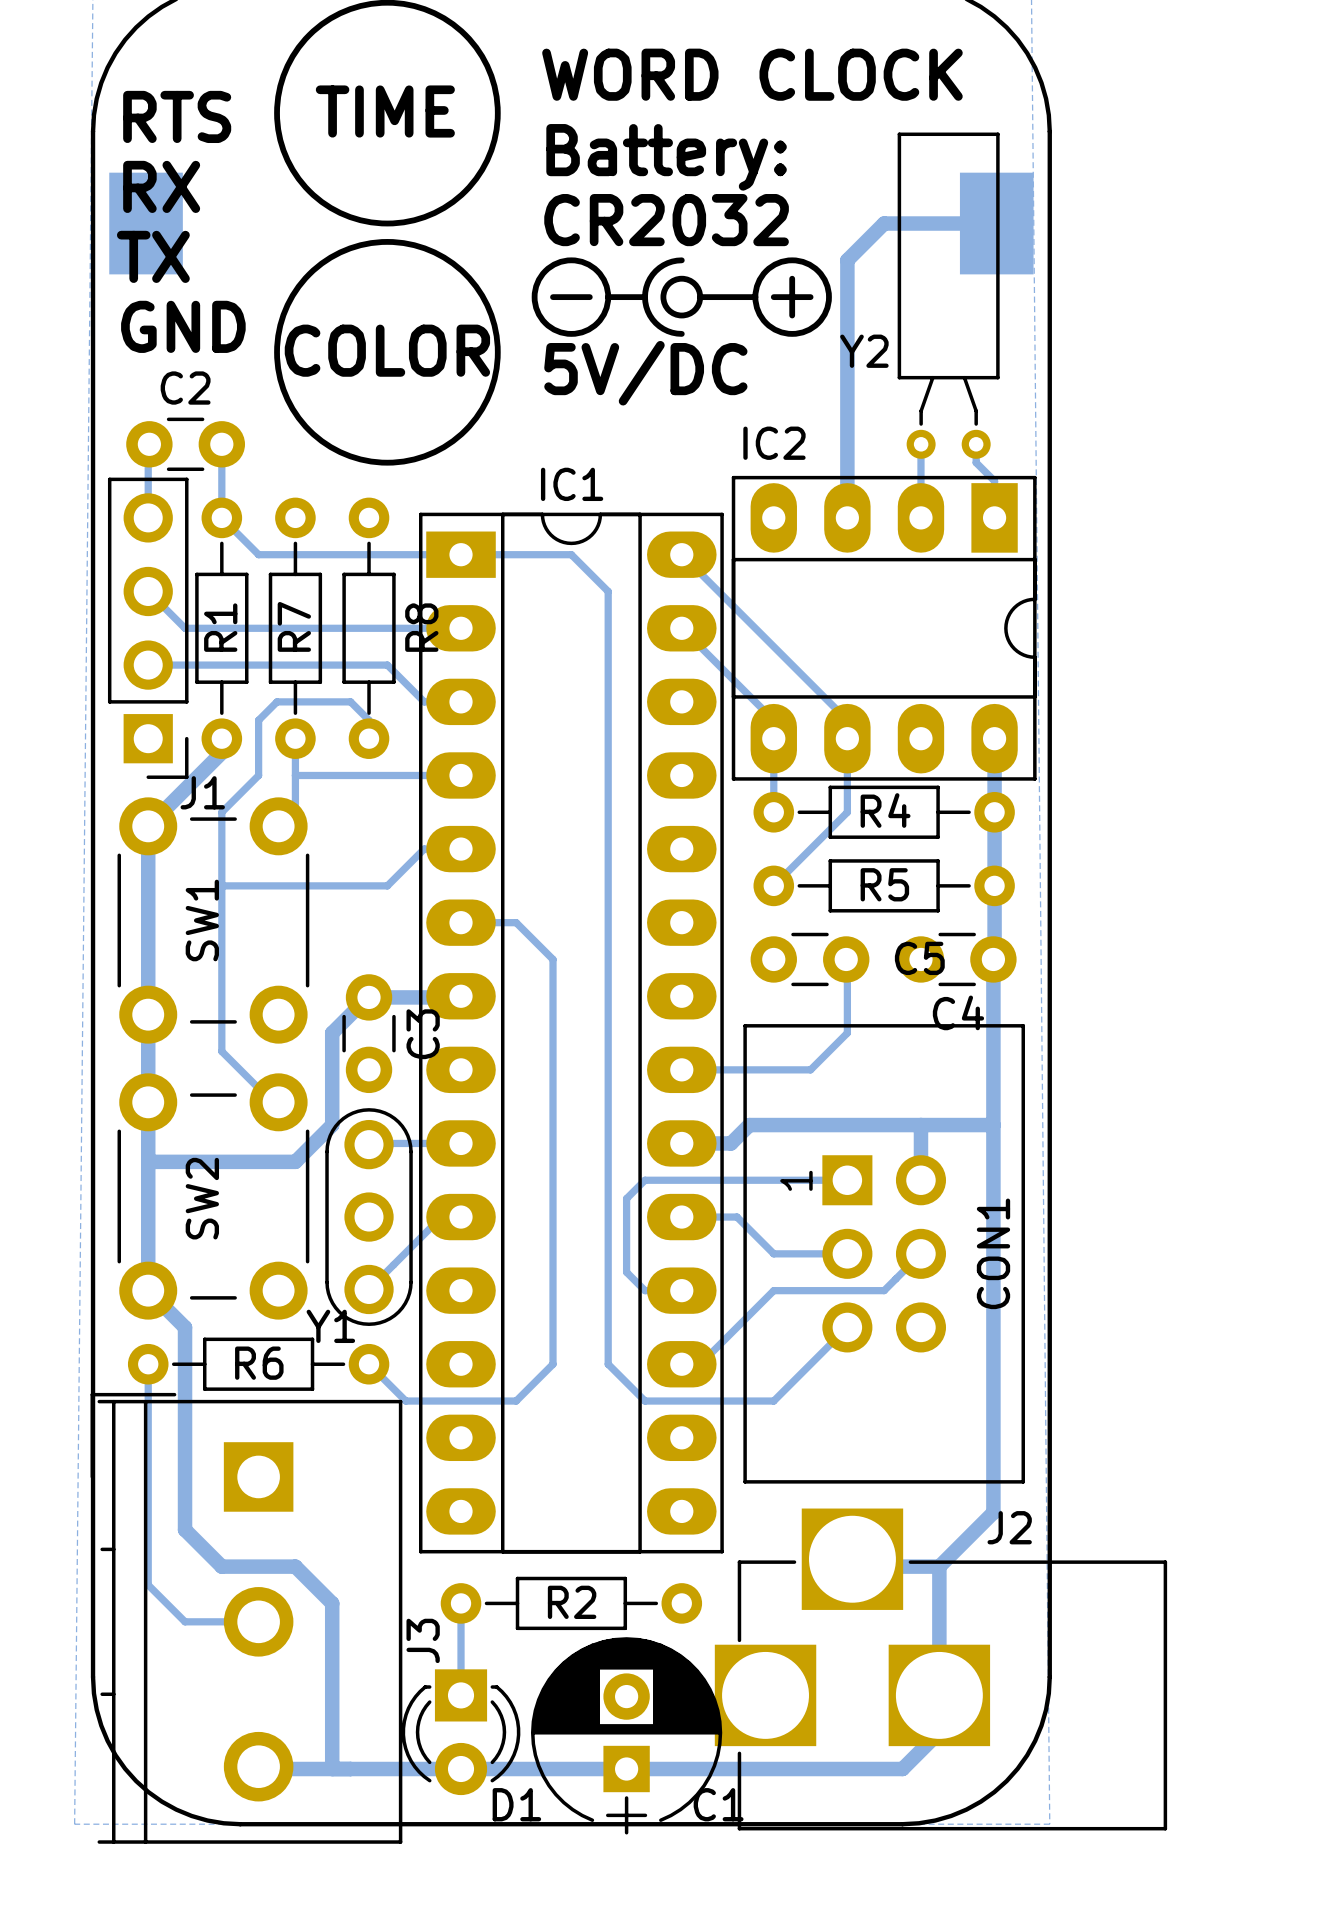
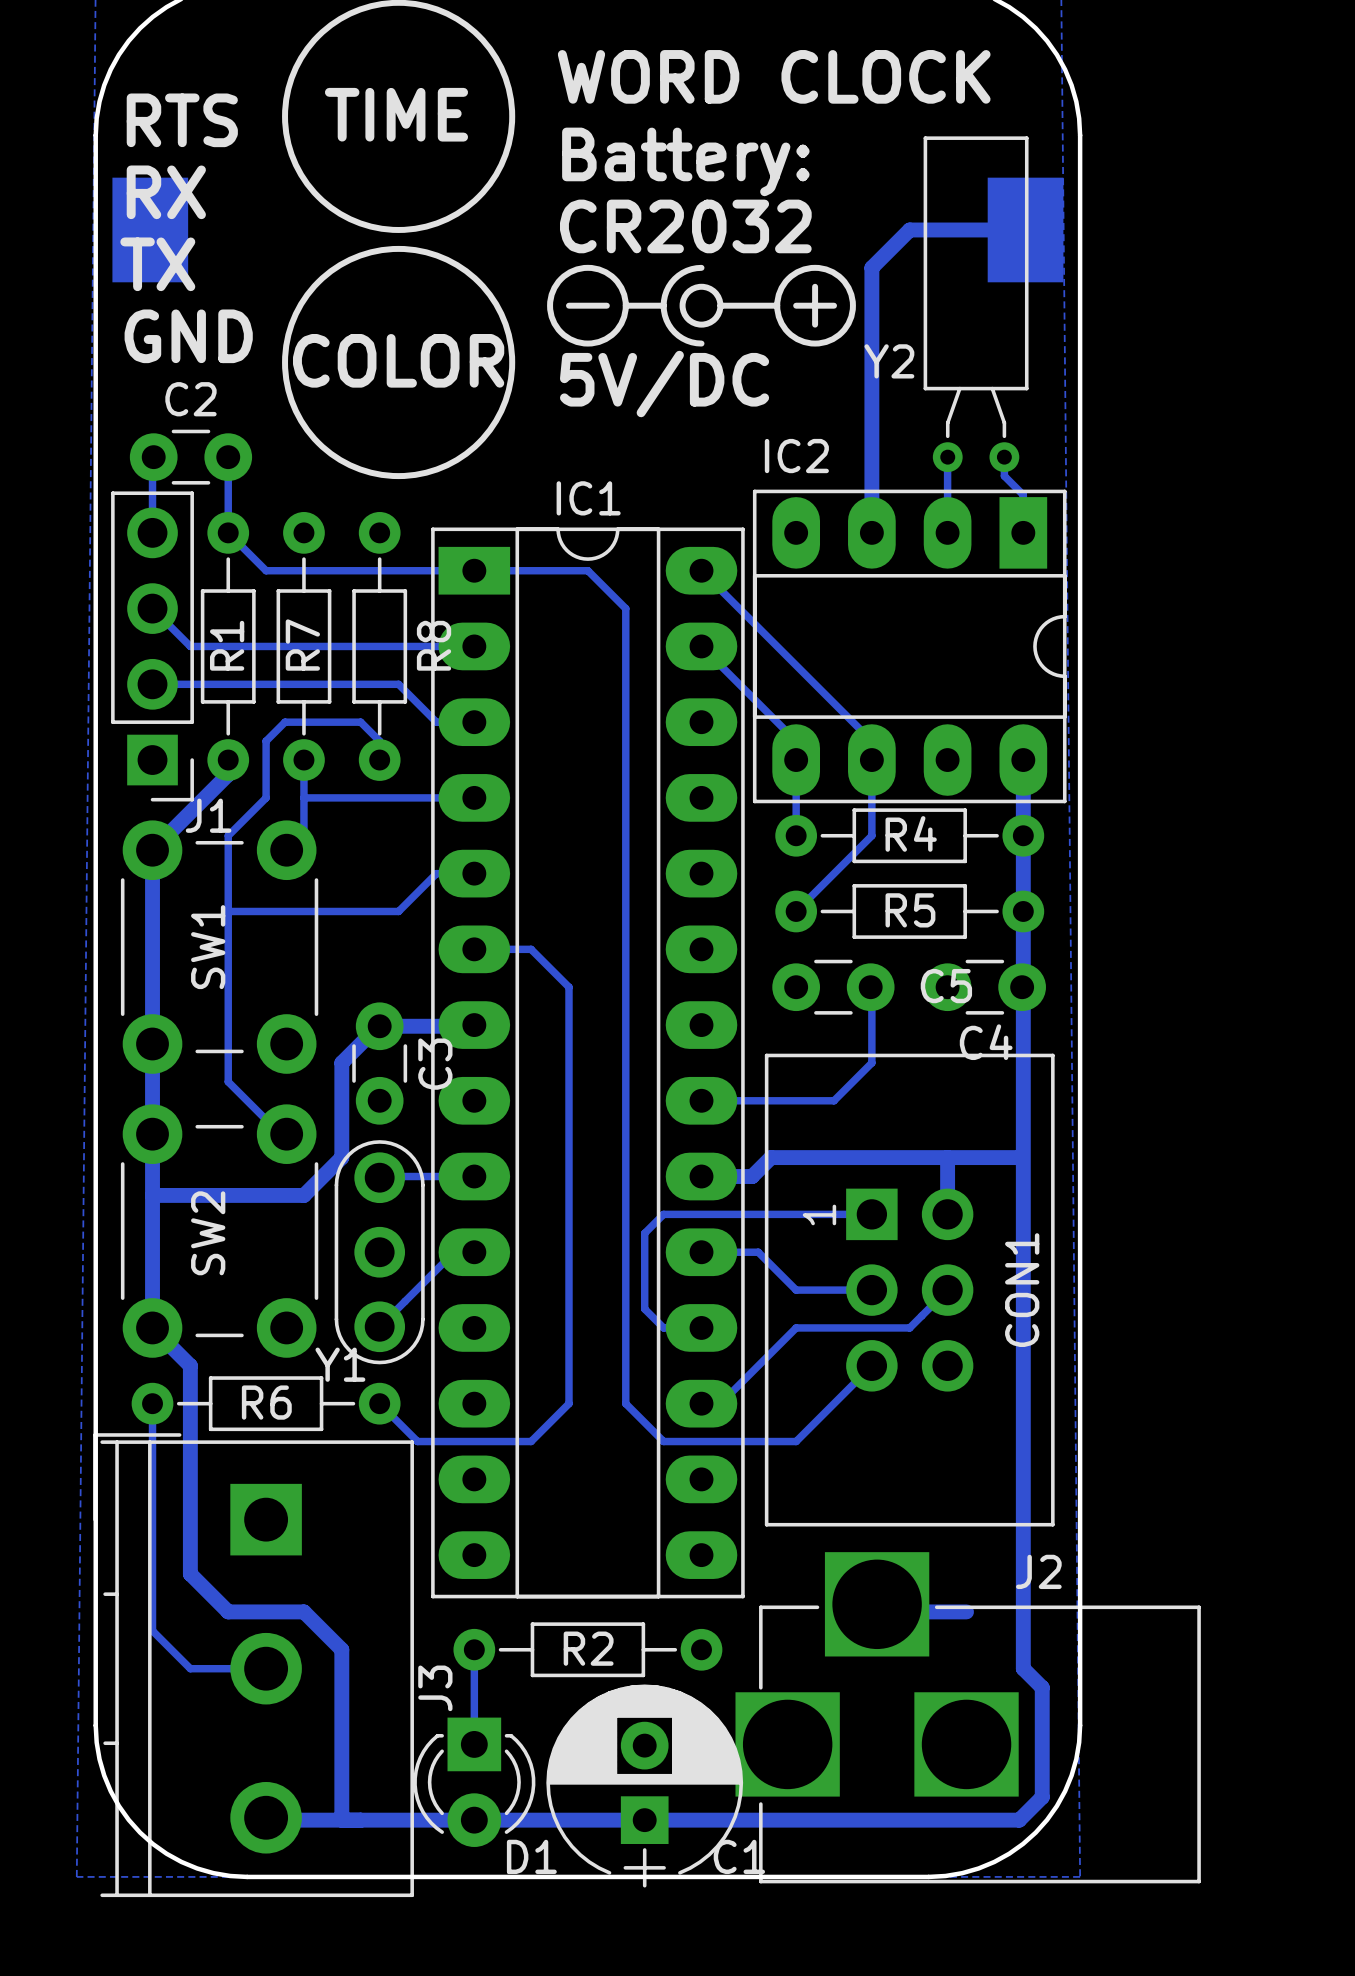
bottom track: (993, 976) (993, 1512) (939, 1566) (939, 1695) -> (1022, 1004) (1023, 1668) (1042, 1687) (1042, 1797) (1019, 1820) (928, 1820)
bottom track: (939, 1732) (902, 1769) -> none

